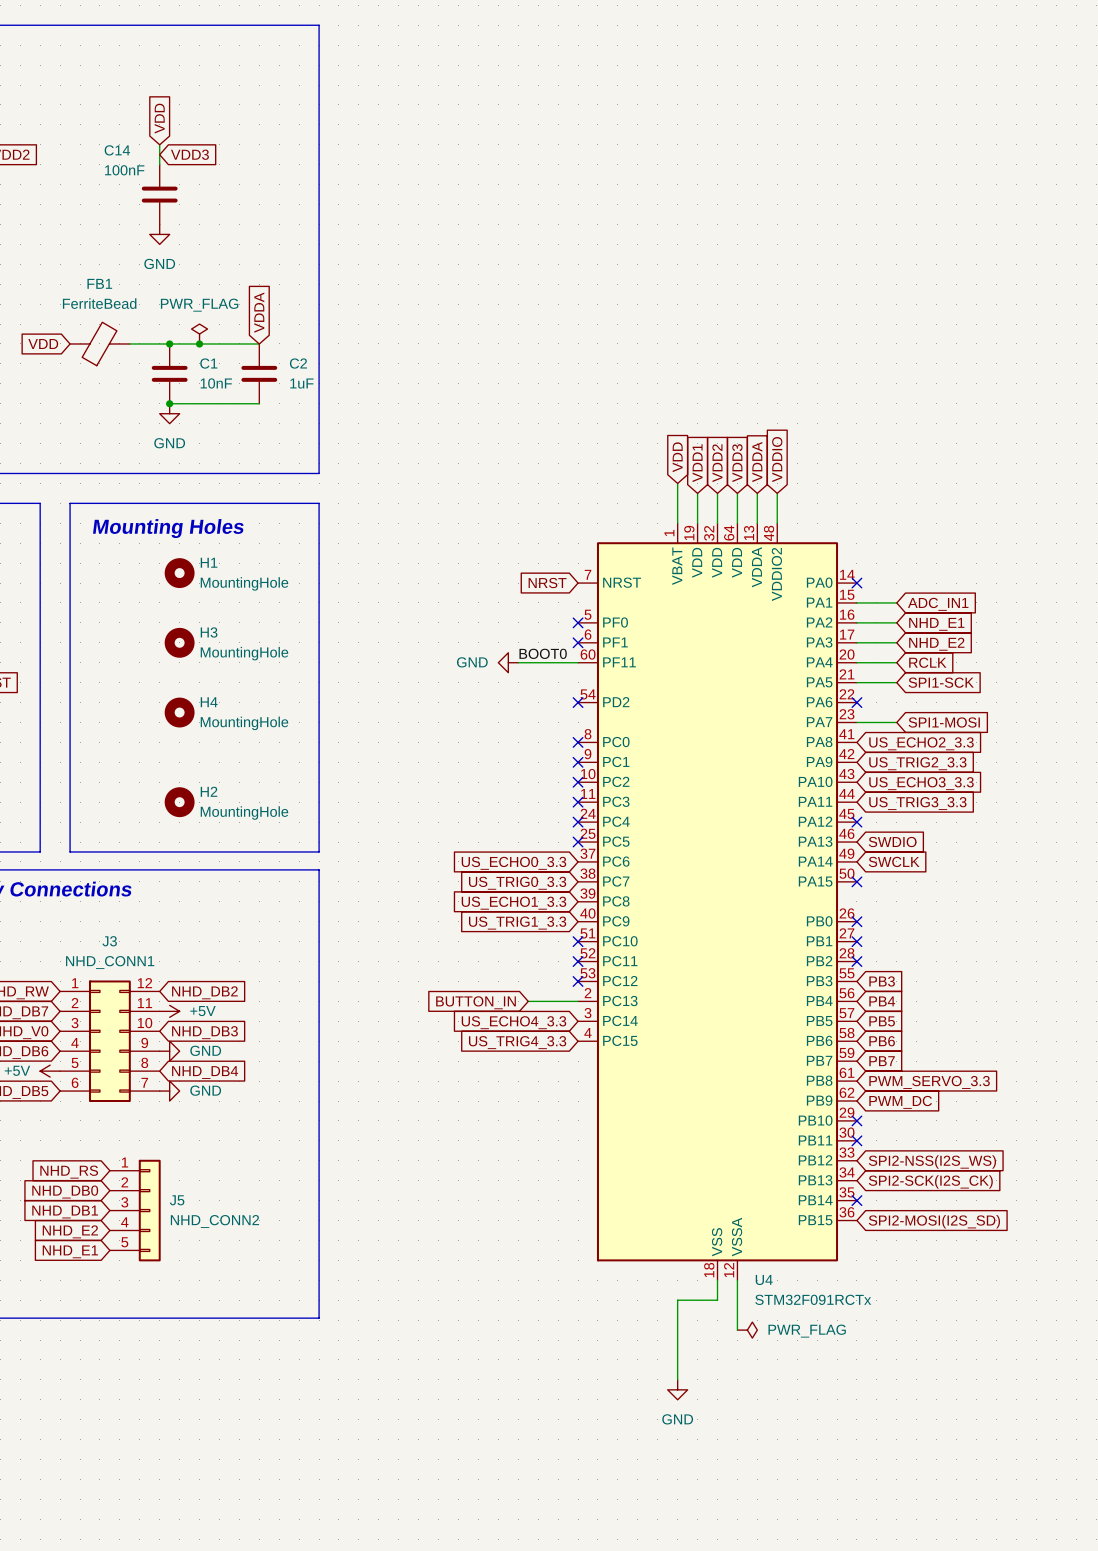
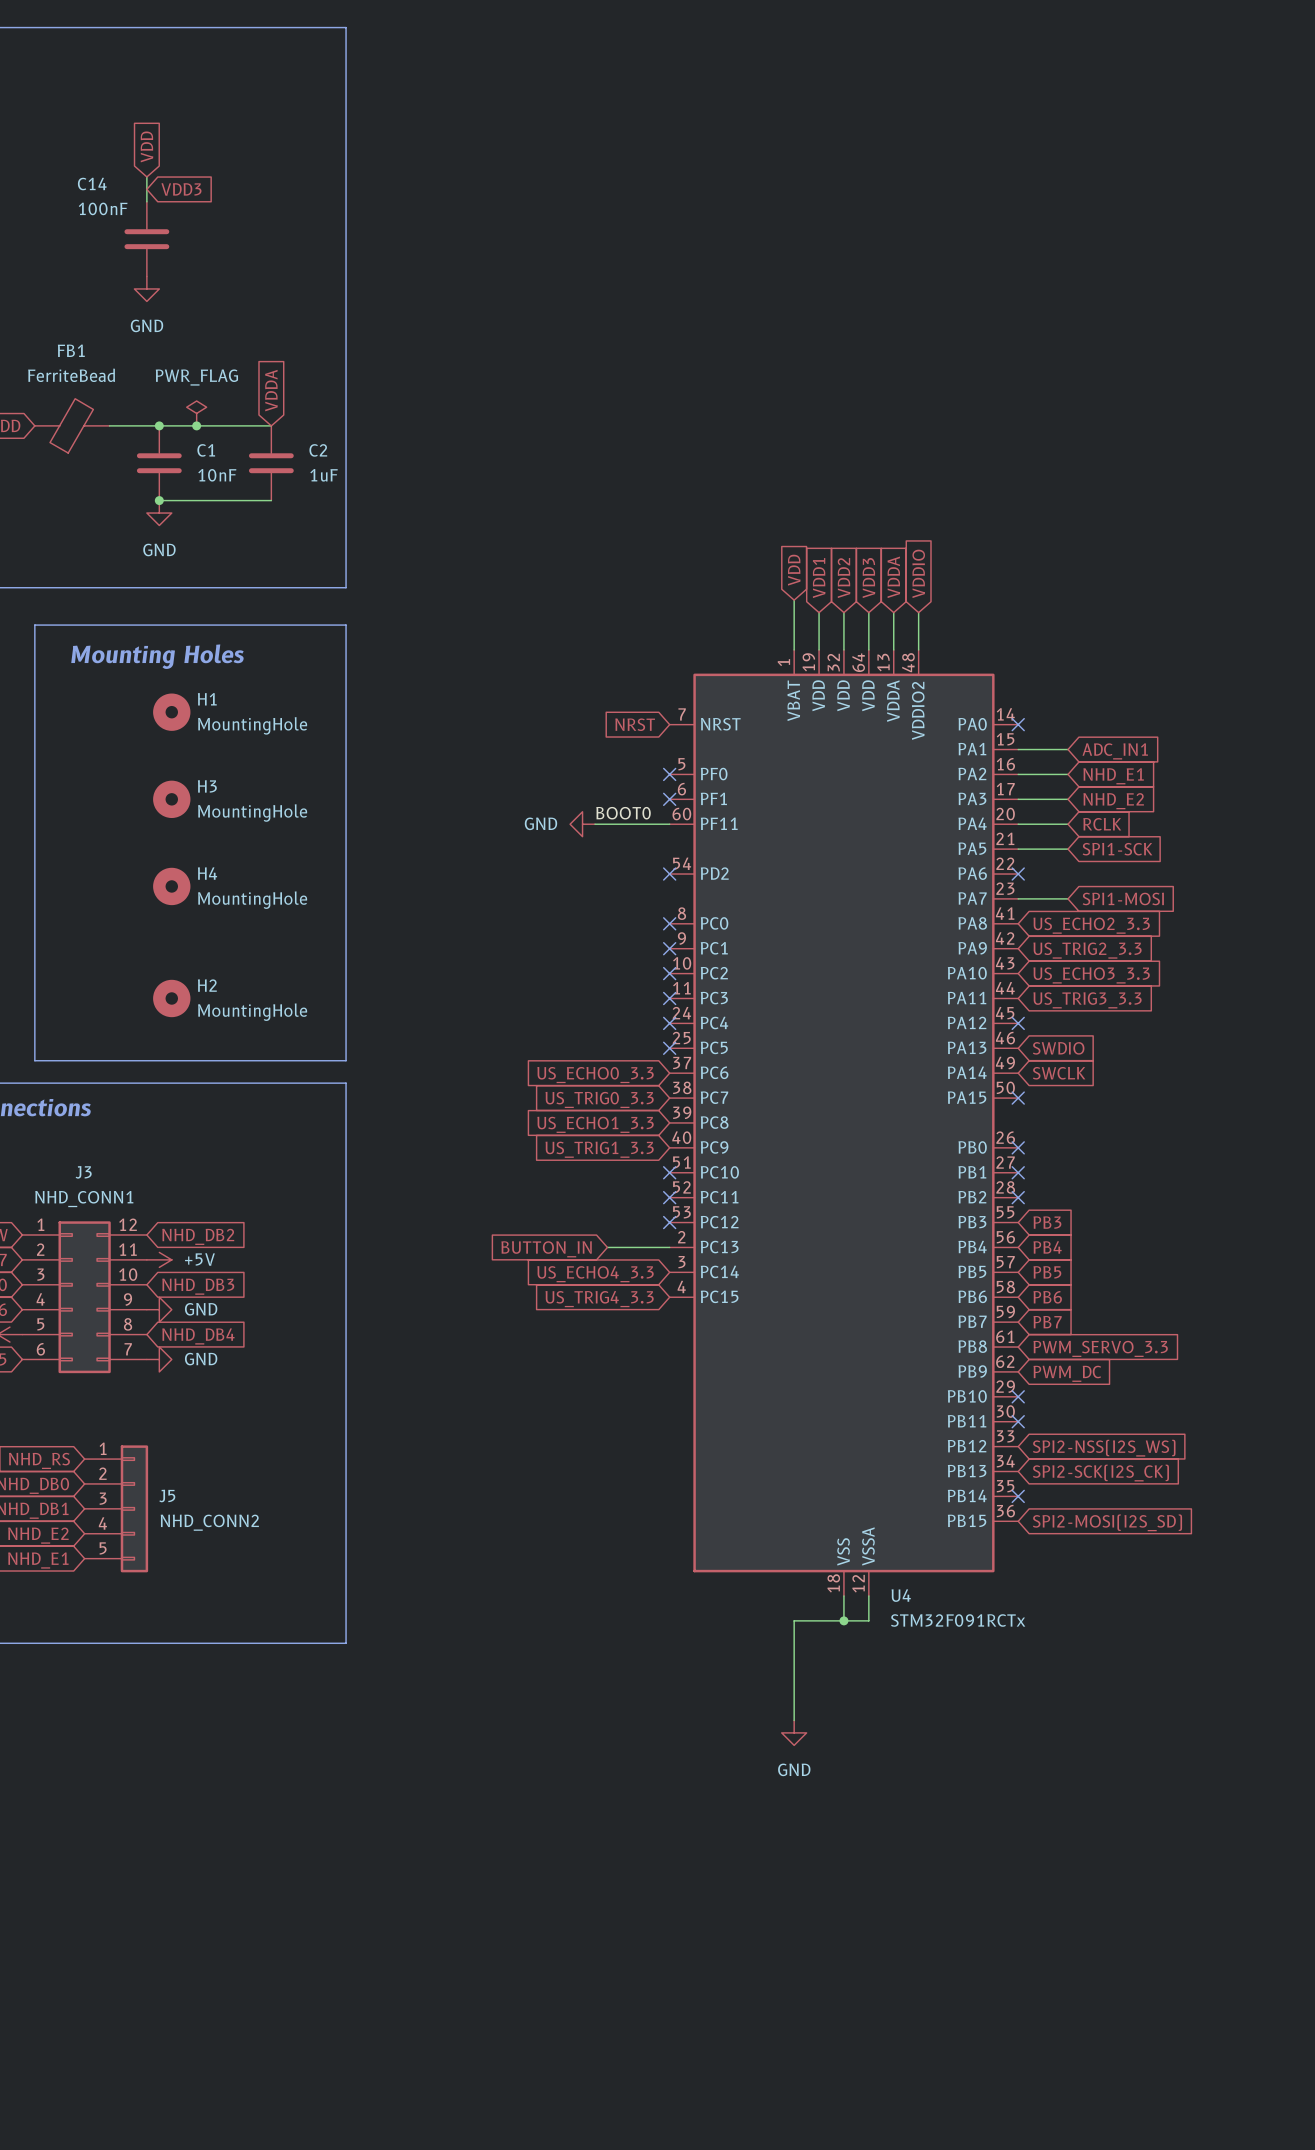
junction: none -> (843, 1620)
wire: (737, 1300) (737, 1330) -> (868, 1620) (843, 1620)
power symbol: PWR_FLAG (747, 1330) -> none

